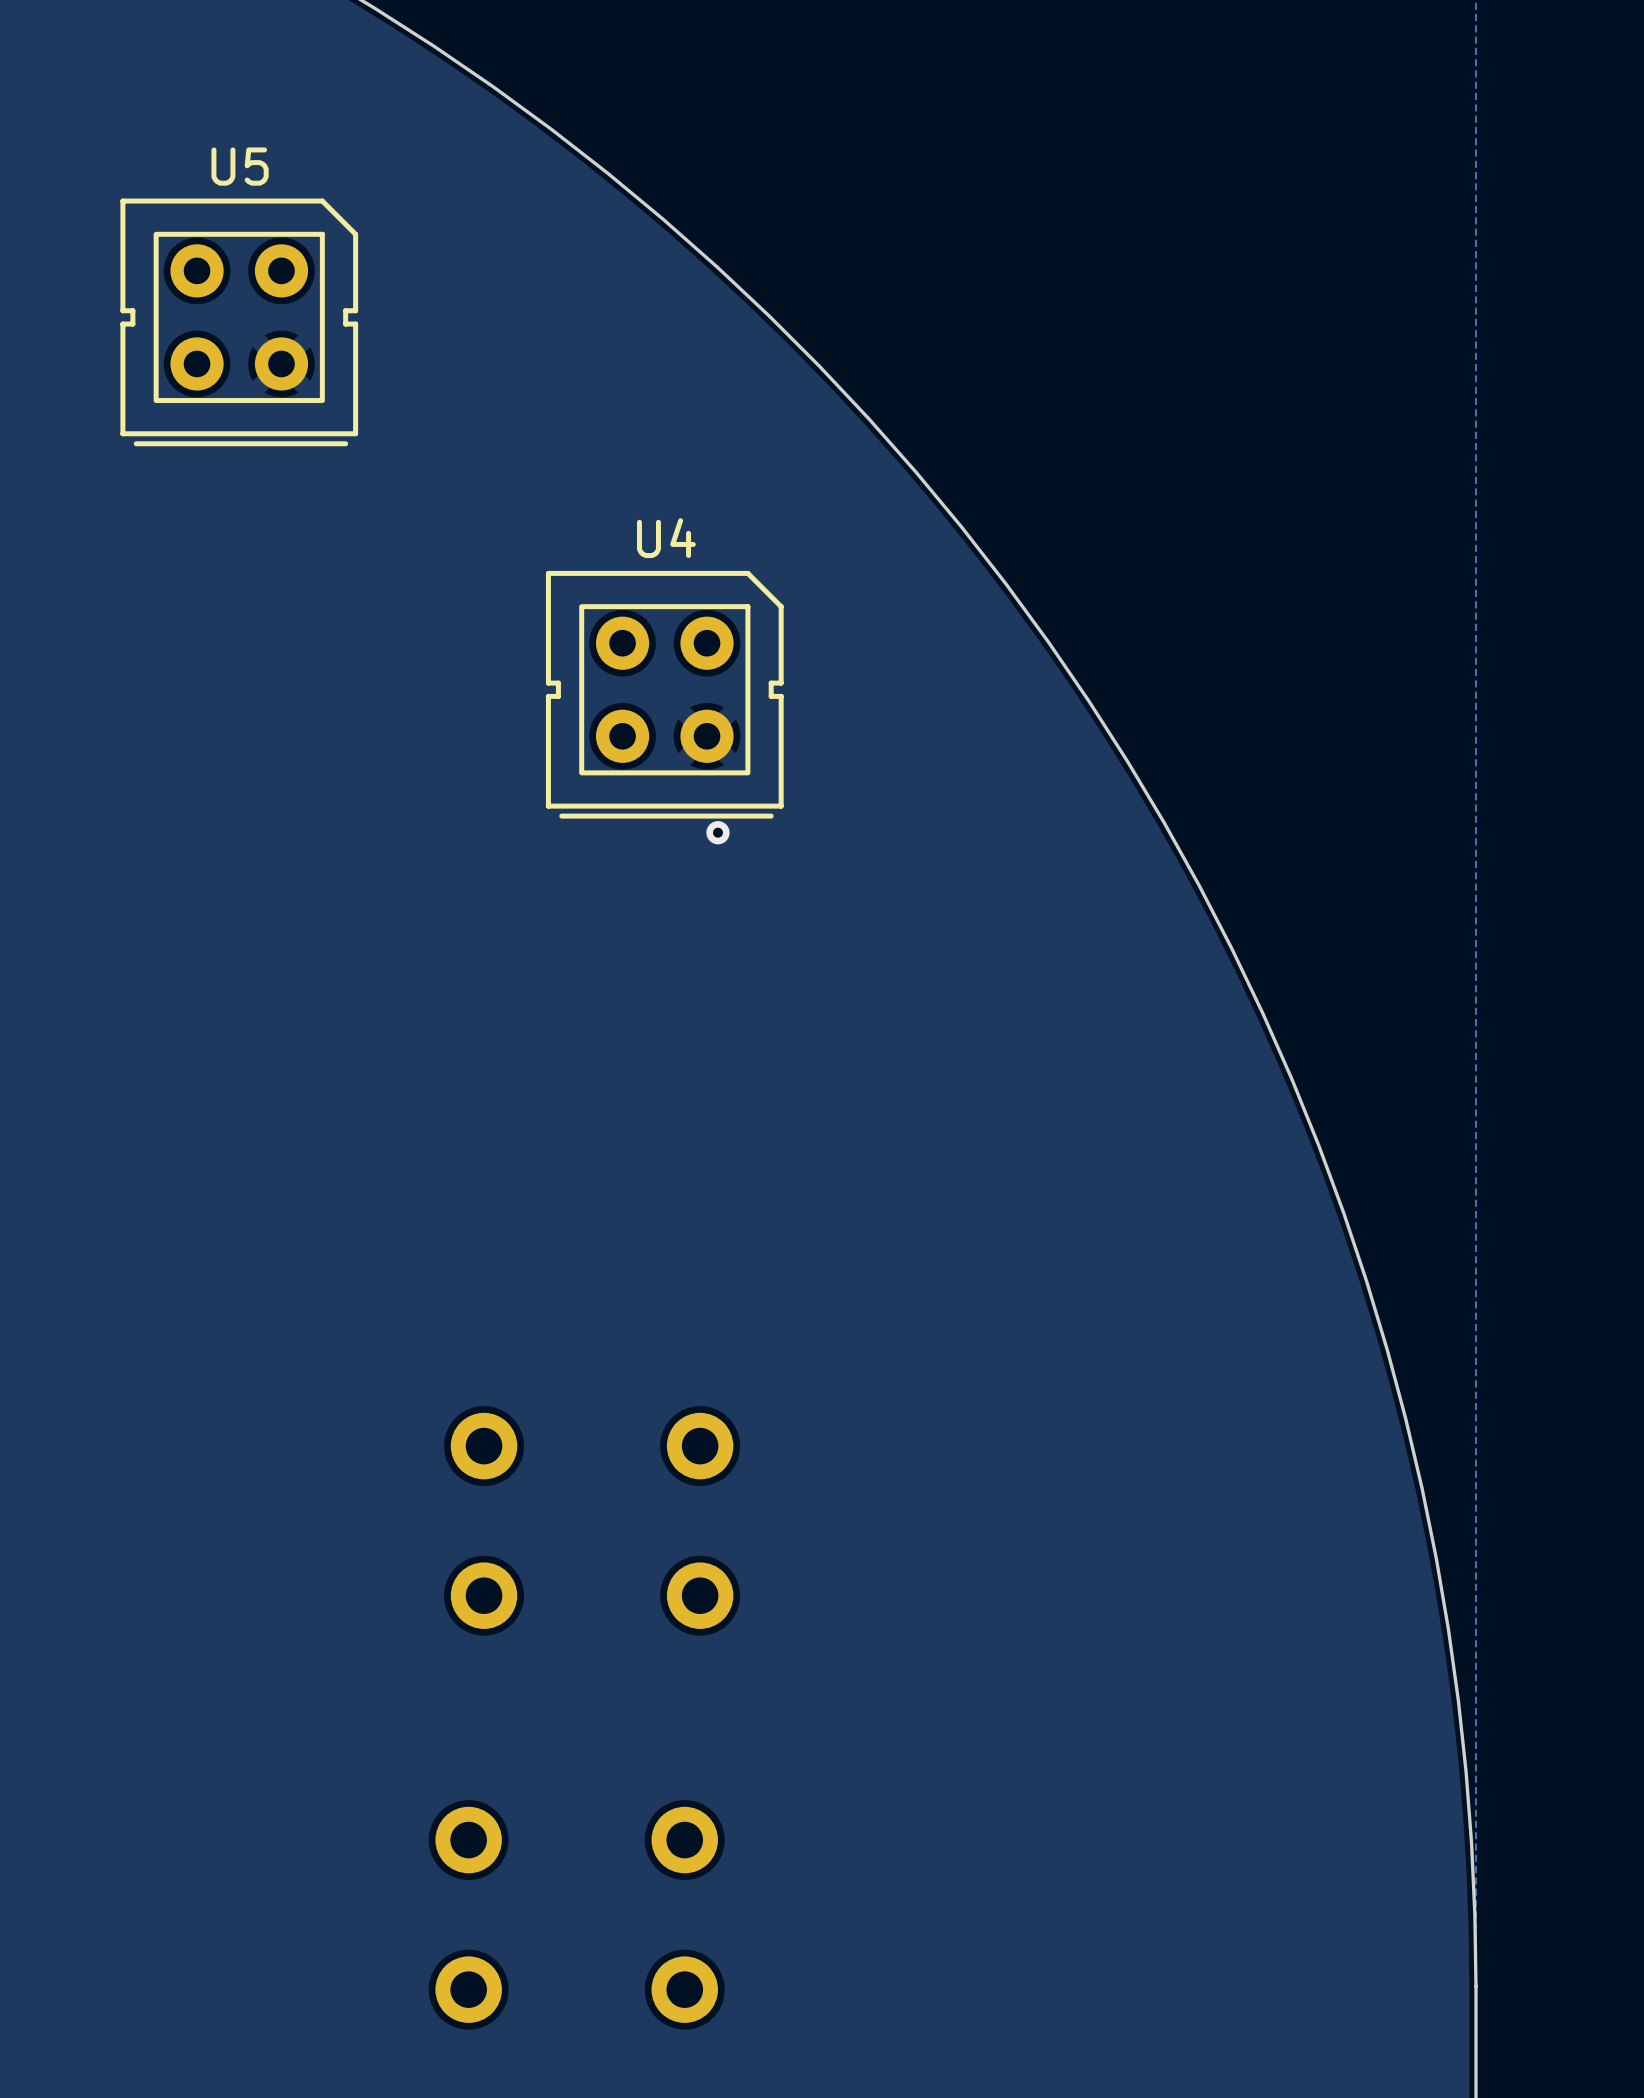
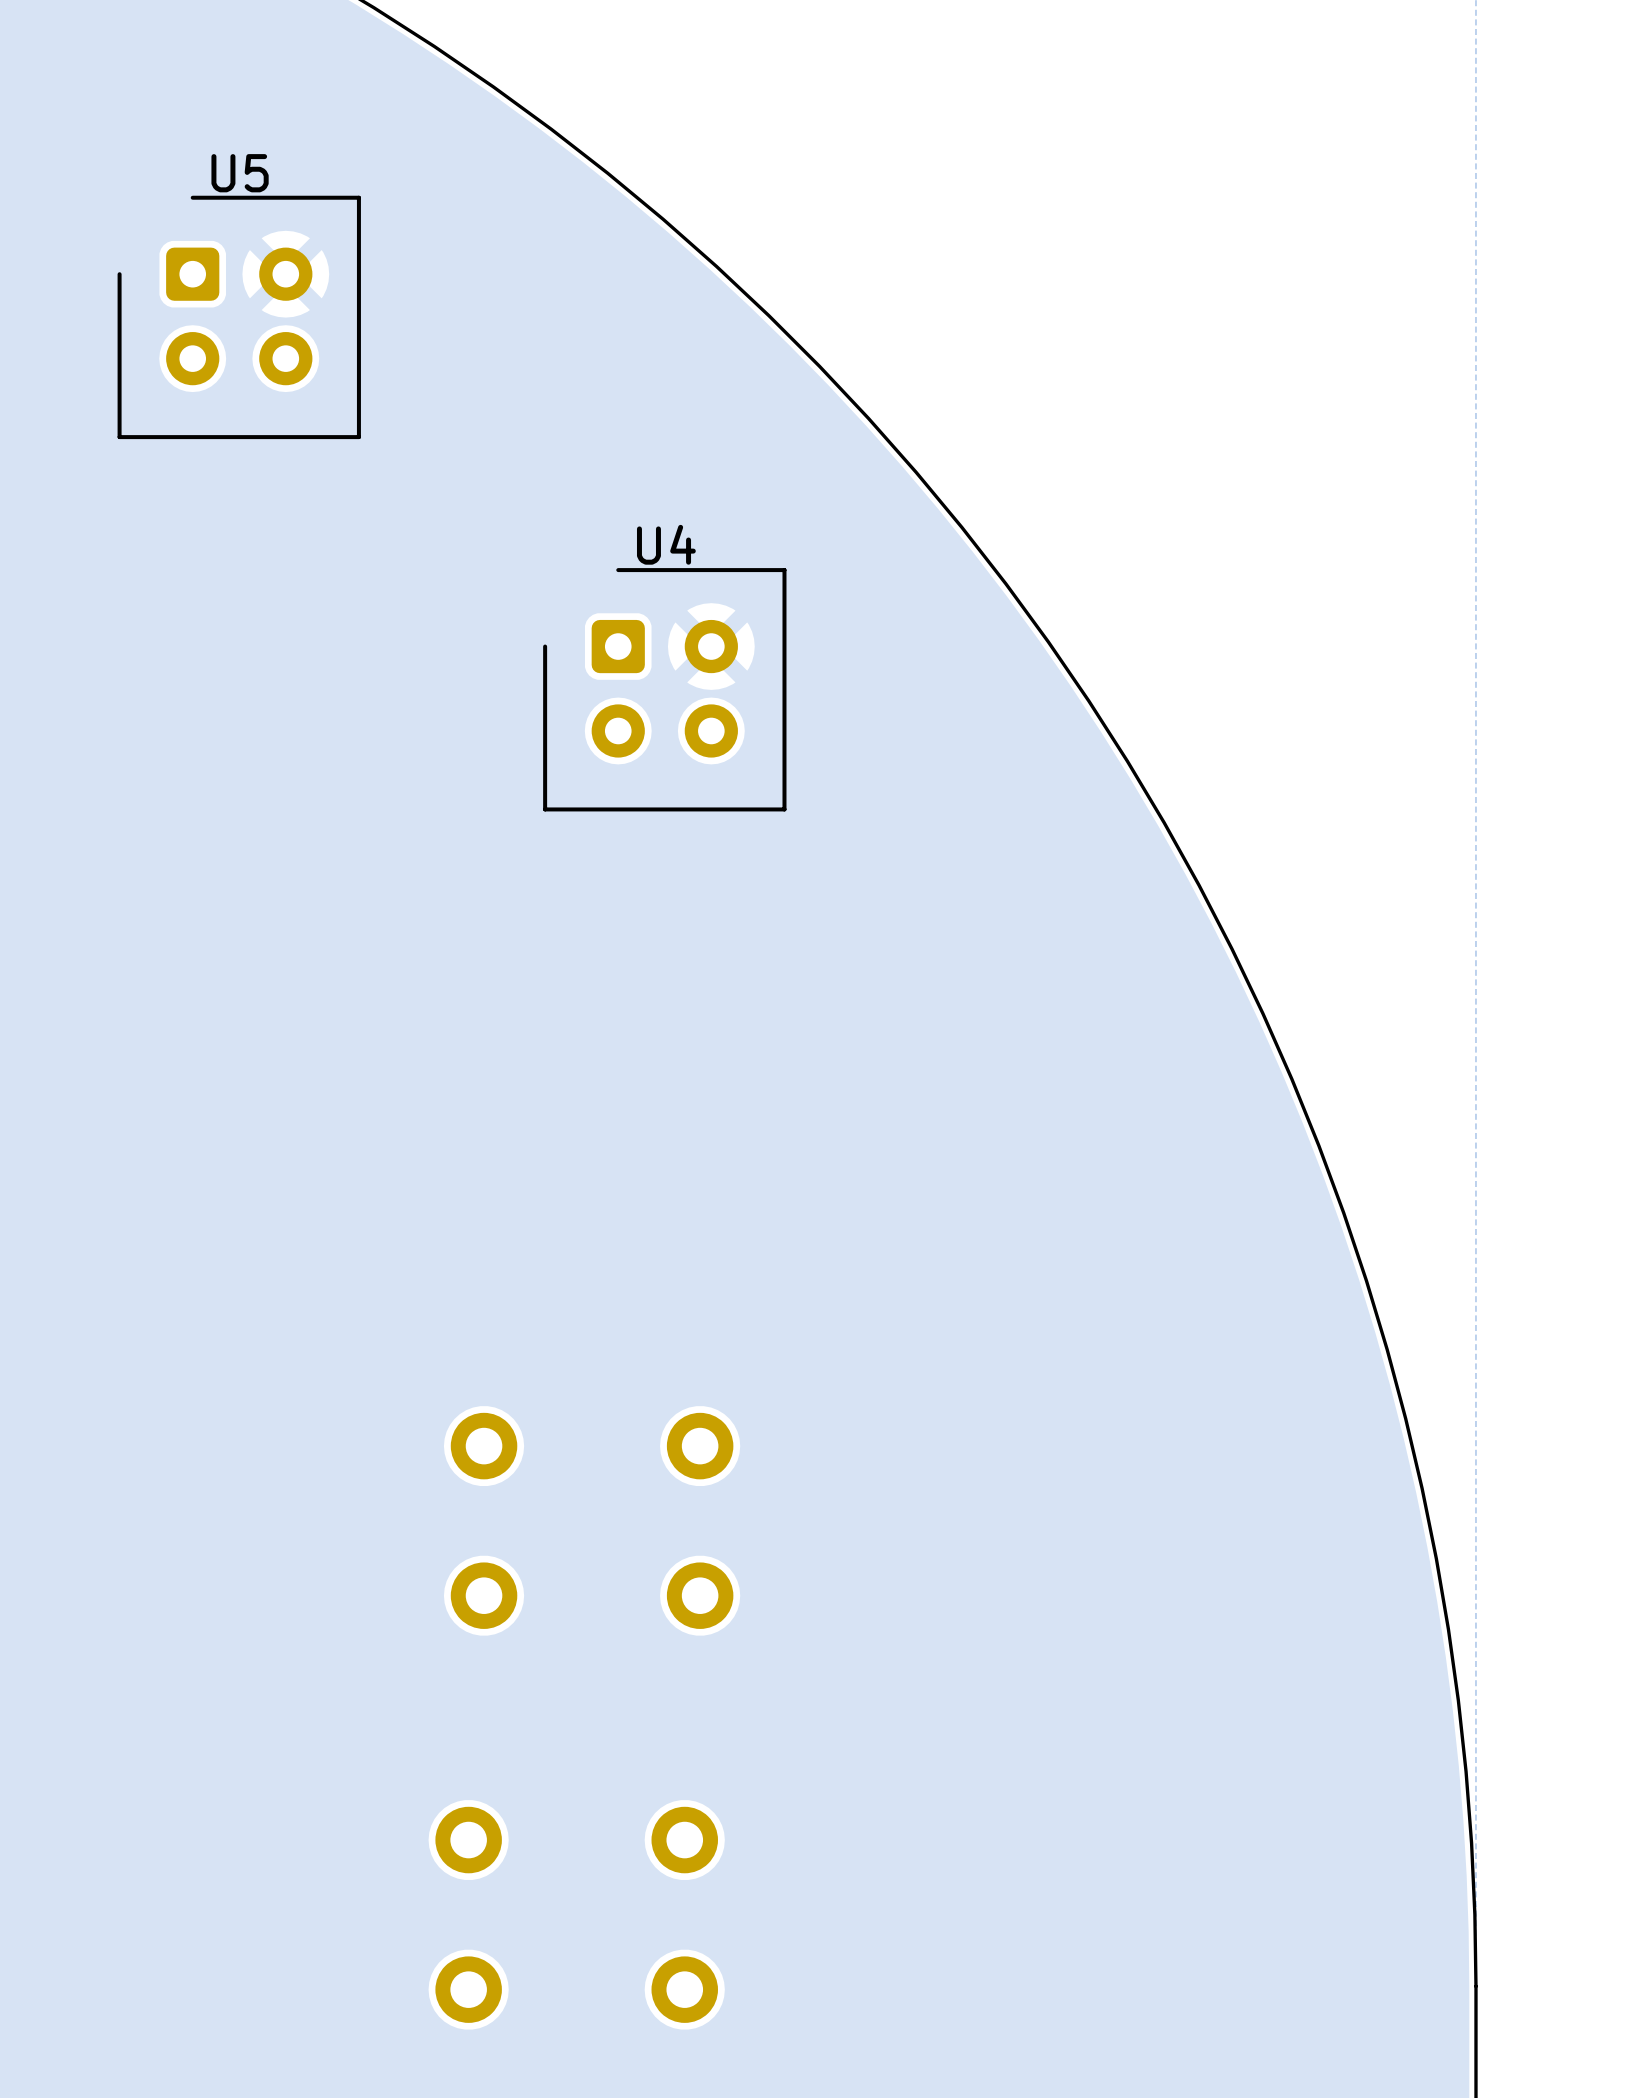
U5 footprint: [120, 198, 359, 447] -> [117, 195, 361, 440]
U4 footprint: [545, 570, 784, 819] -> [543, 568, 787, 812]
via: (717, 832) -> none

